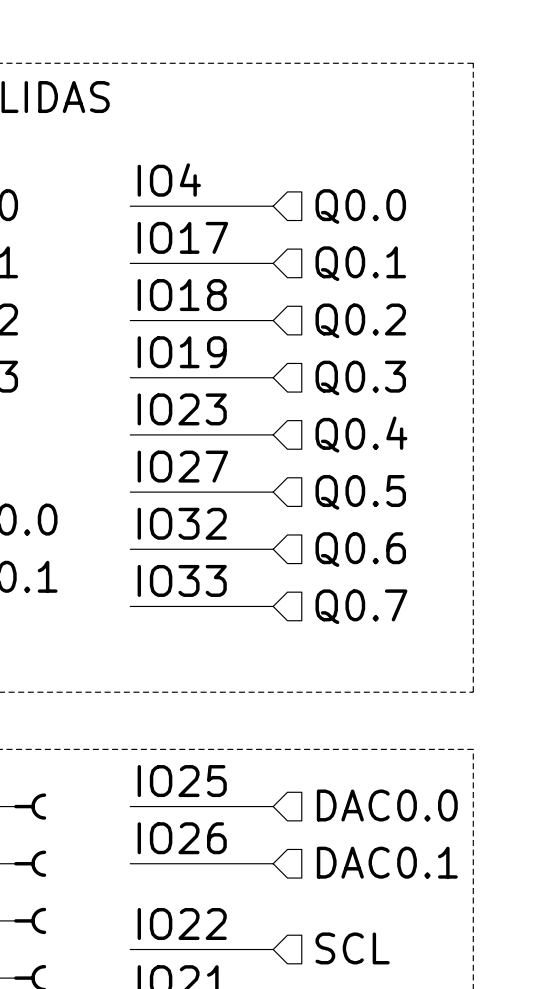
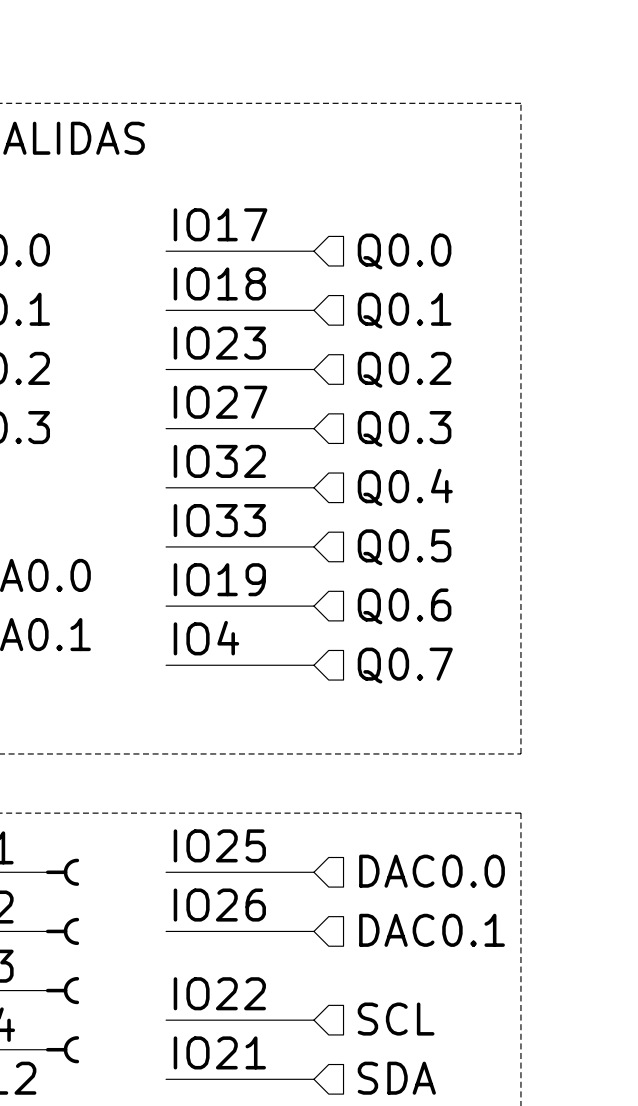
label: IO4 (169, 180) -> IO17 (220, 224)
label: IO17 (182, 237) -> IO18 (219, 283)
label: IO18 (182, 295) -> IO23 (219, 343)
label: IO19 (182, 352) -> IO27 (220, 402)
label: IO23 (182, 409) -> IO32 (219, 461)
label: IO27 (182, 466) -> IO33 (219, 520)
label: IO32 (182, 523) -> IO19 (219, 579)
label: IO33 (182, 580) -> IO4 (206, 638)

